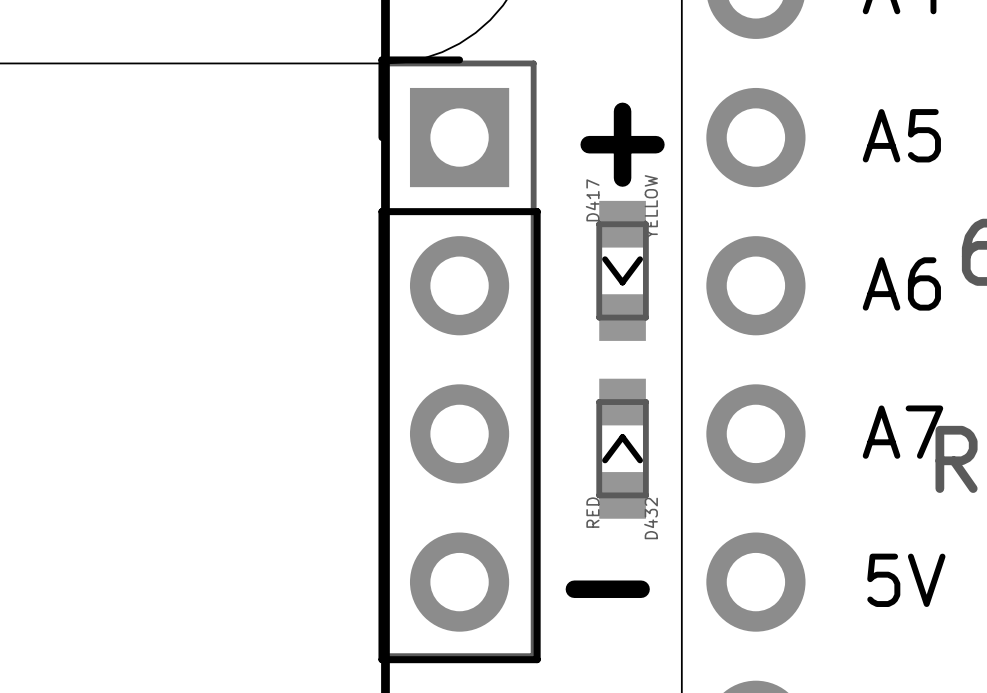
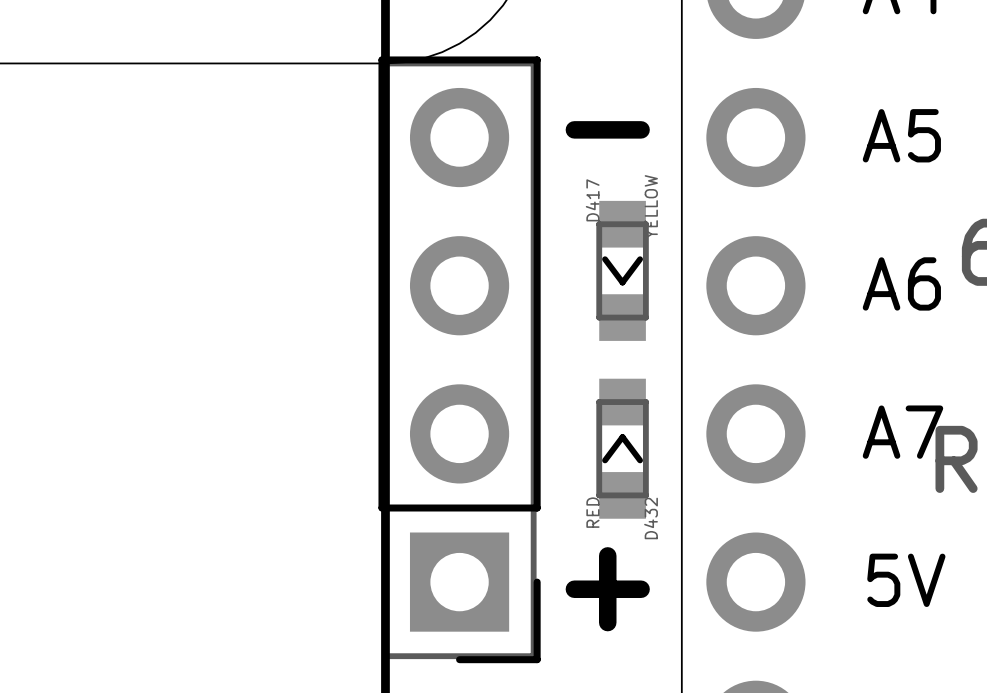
text: + (622, 144) -> - (607, 129)
part rotation: 0° (459, 359) -> 180° (459, 359)
text: - (607, 589) -> + (607, 589)

